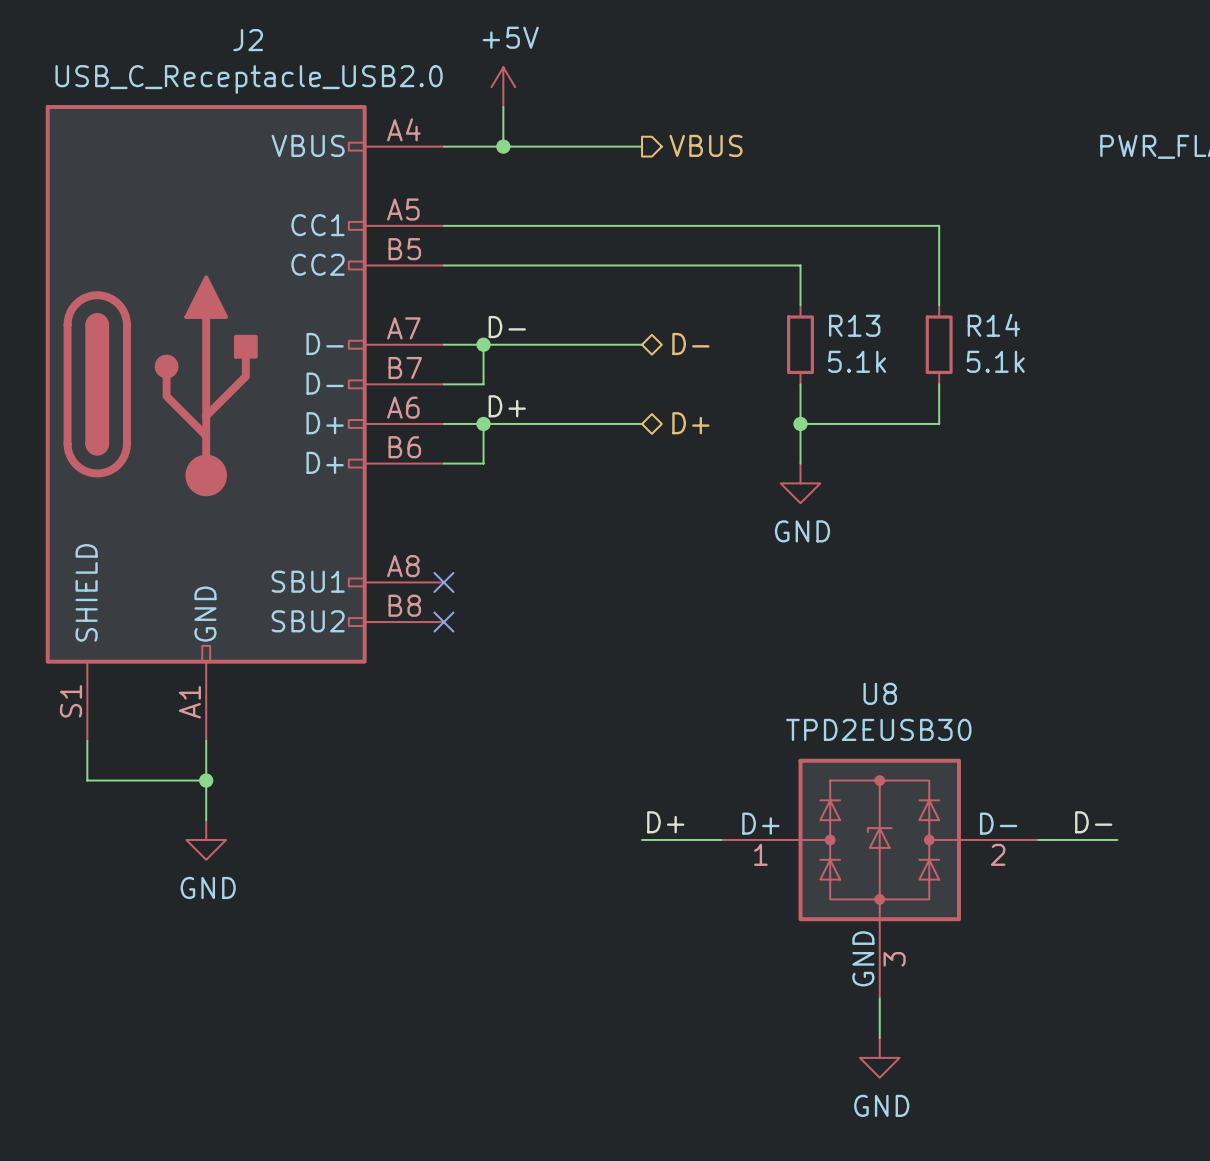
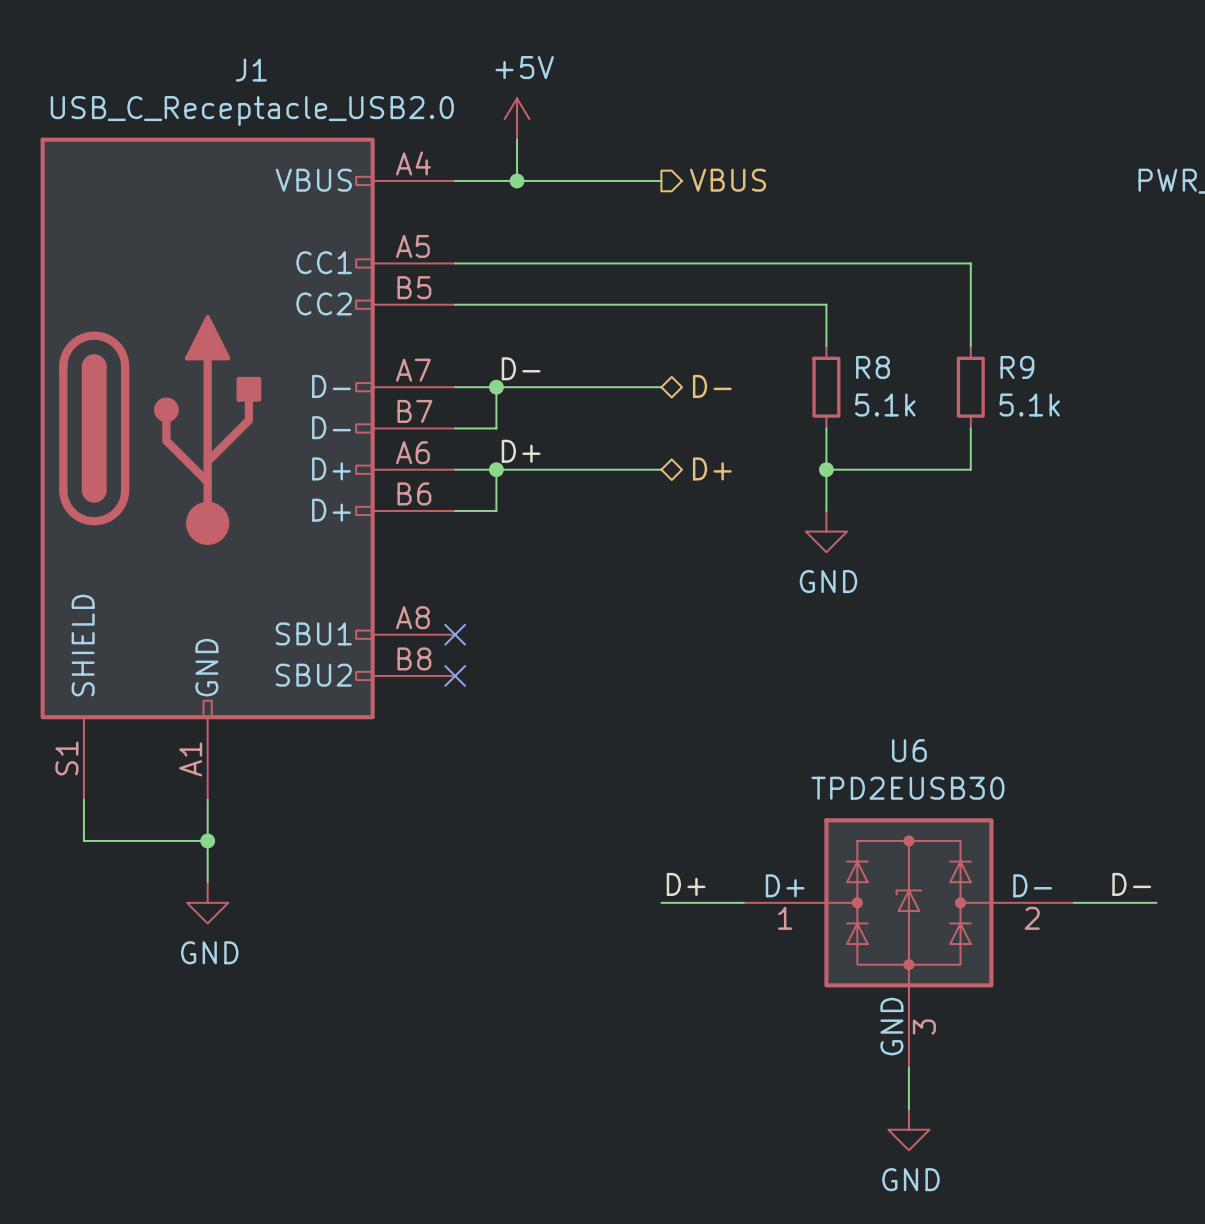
J2 name: J2 (248, 40) -> J1 (251, 70)
R13 name: R13 (854, 325) -> R8 (873, 367)
R14 name: R14 (993, 325) -> R9 (1017, 367)
U8 name: U8 (880, 693) -> U6 (909, 750)

